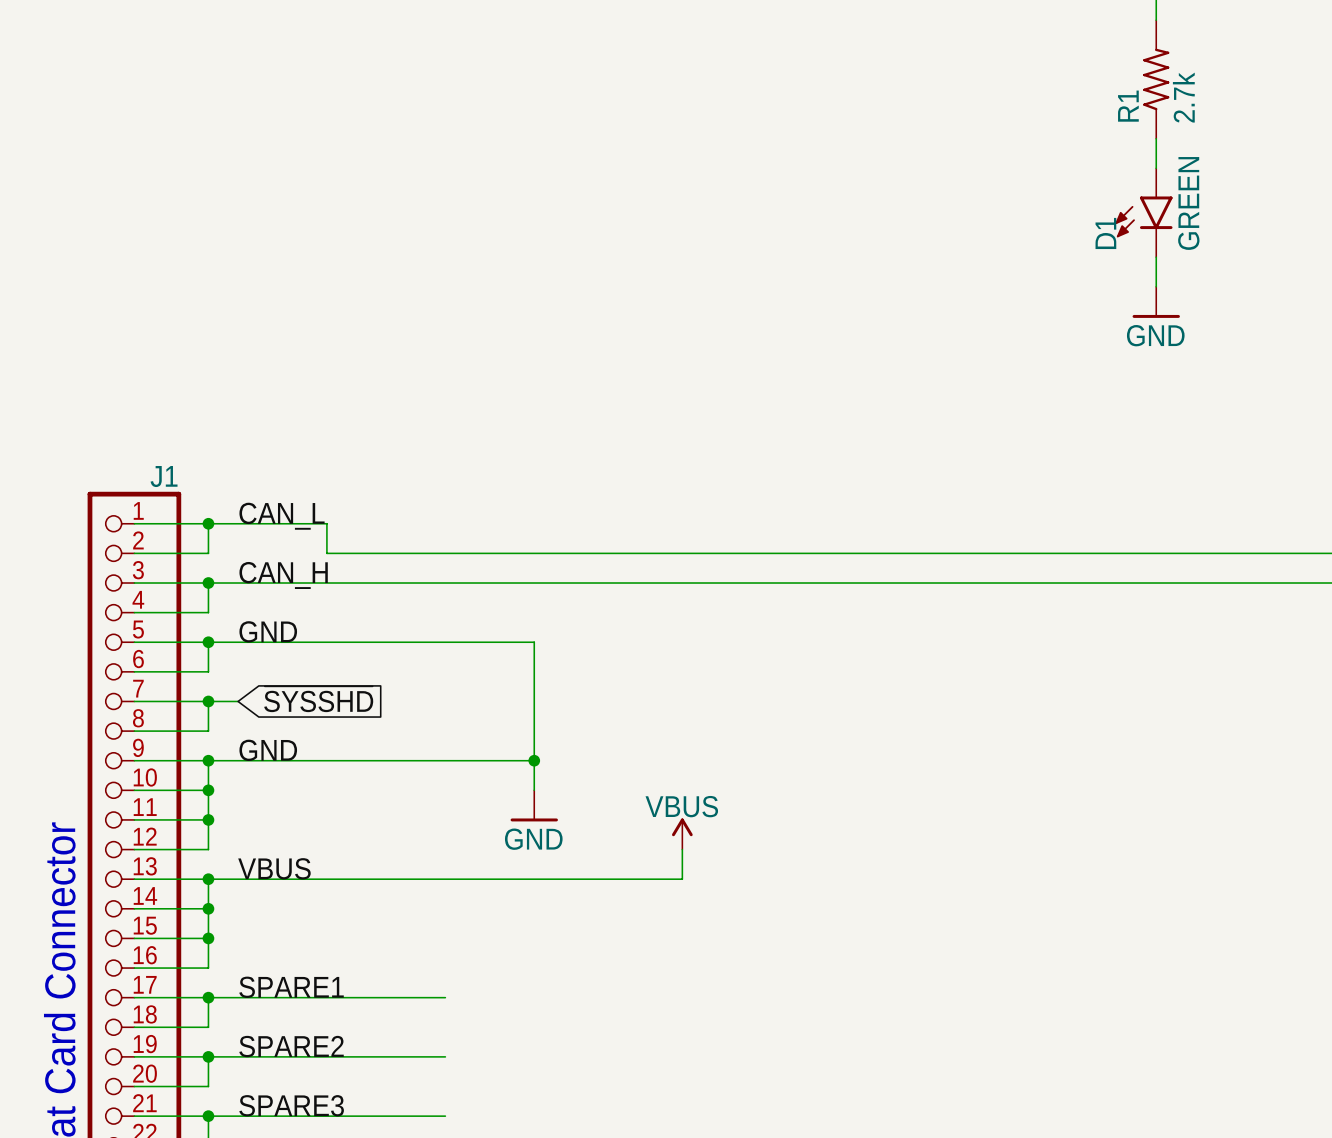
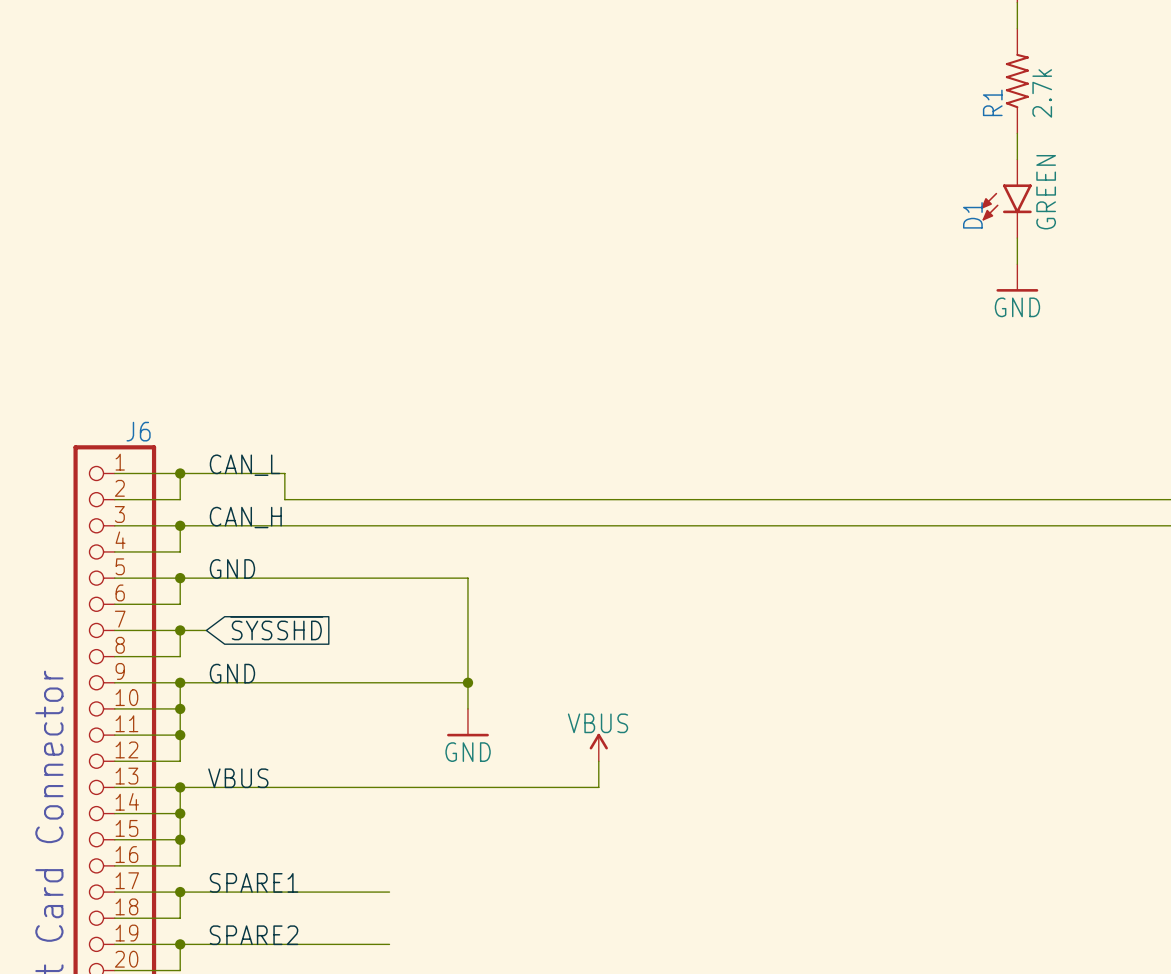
J1 name: J1 (164, 476) -> J6 (138, 431)

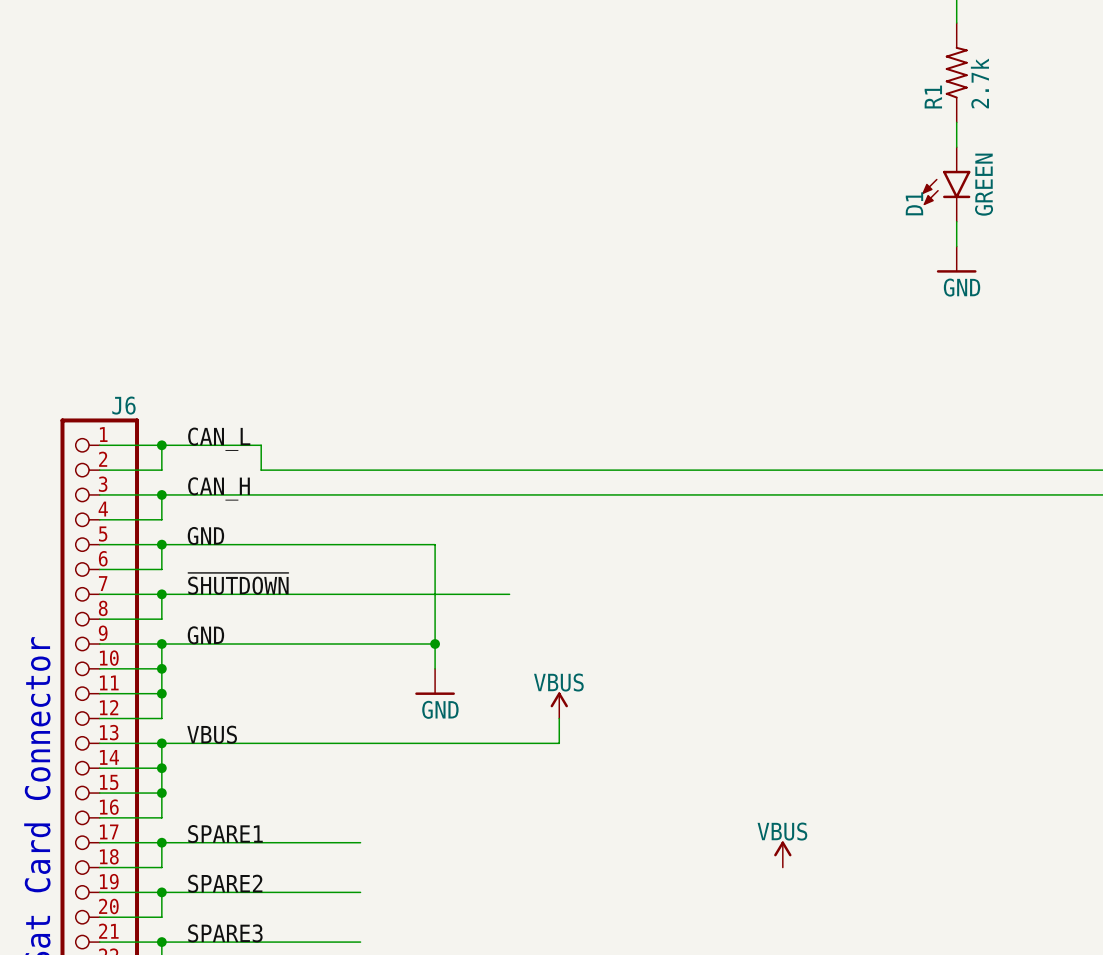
label: none -> ~{SHUTDOWN} (238, 583)
global label: ~{SYSSHD} (276, 628) -> none
wire: none -> (186, 594) (509, 594)
power symbol: none -> VBUS (782, 854)

